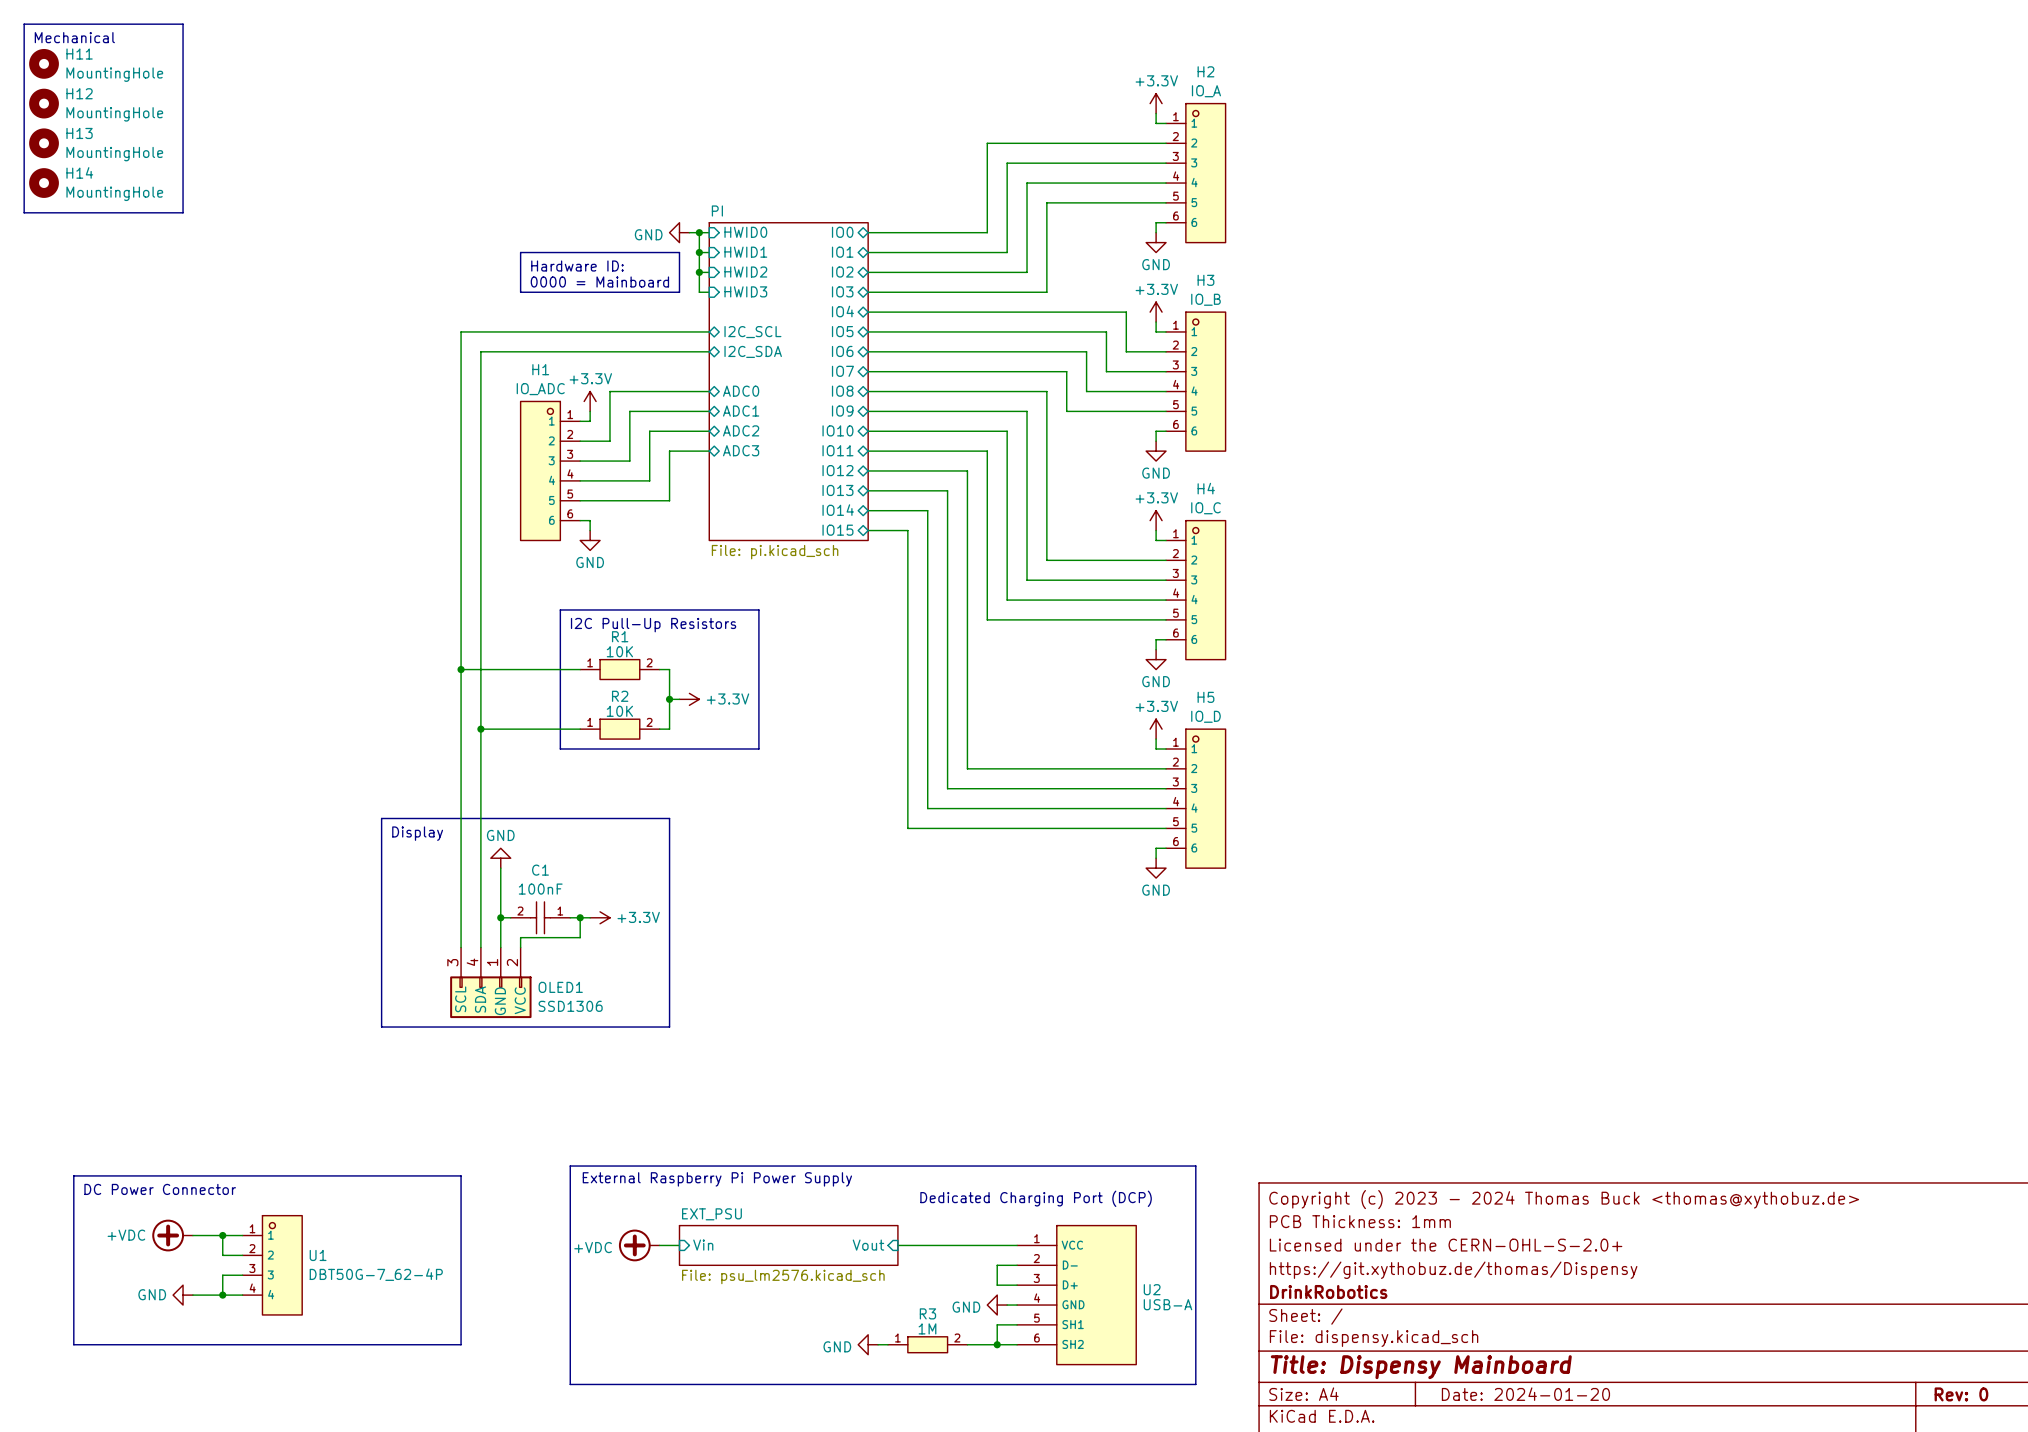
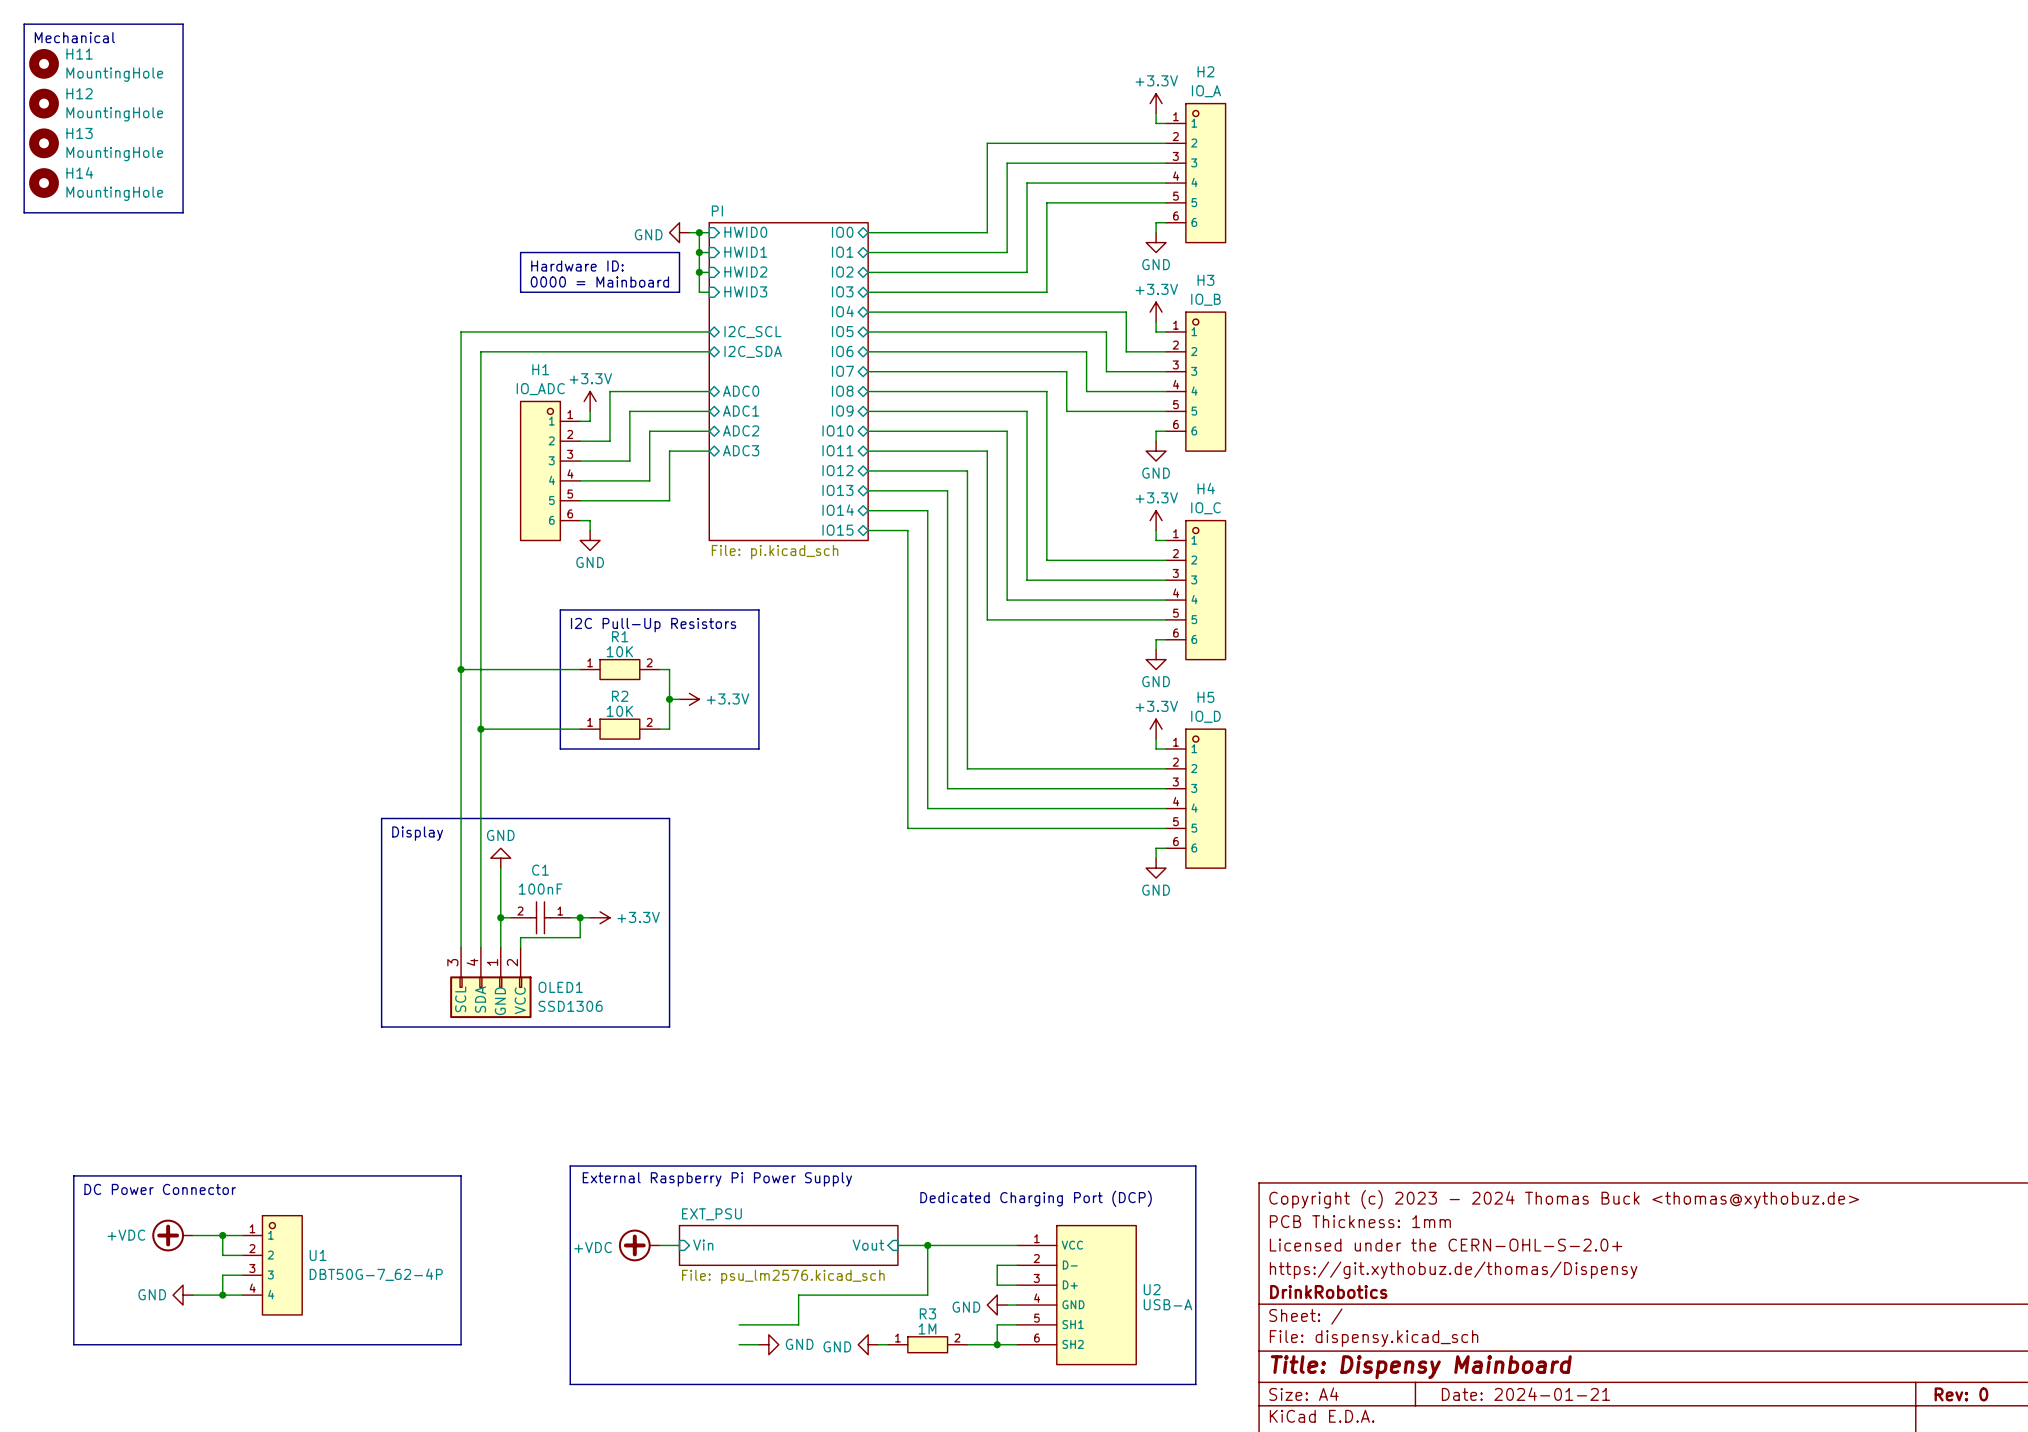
wire: none -> (927, 1245) (927, 1295) (798, 1295) (798, 1324) (739, 1324)
junction: none -> (927, 1245)
wire: none -> (739, 1344) (758, 1344)
power symbol: none -> GND (768, 1344)
title block: Date: 2024-01-20 (1525, 1394) -> Date: 2024-01-21 (1525, 1394)

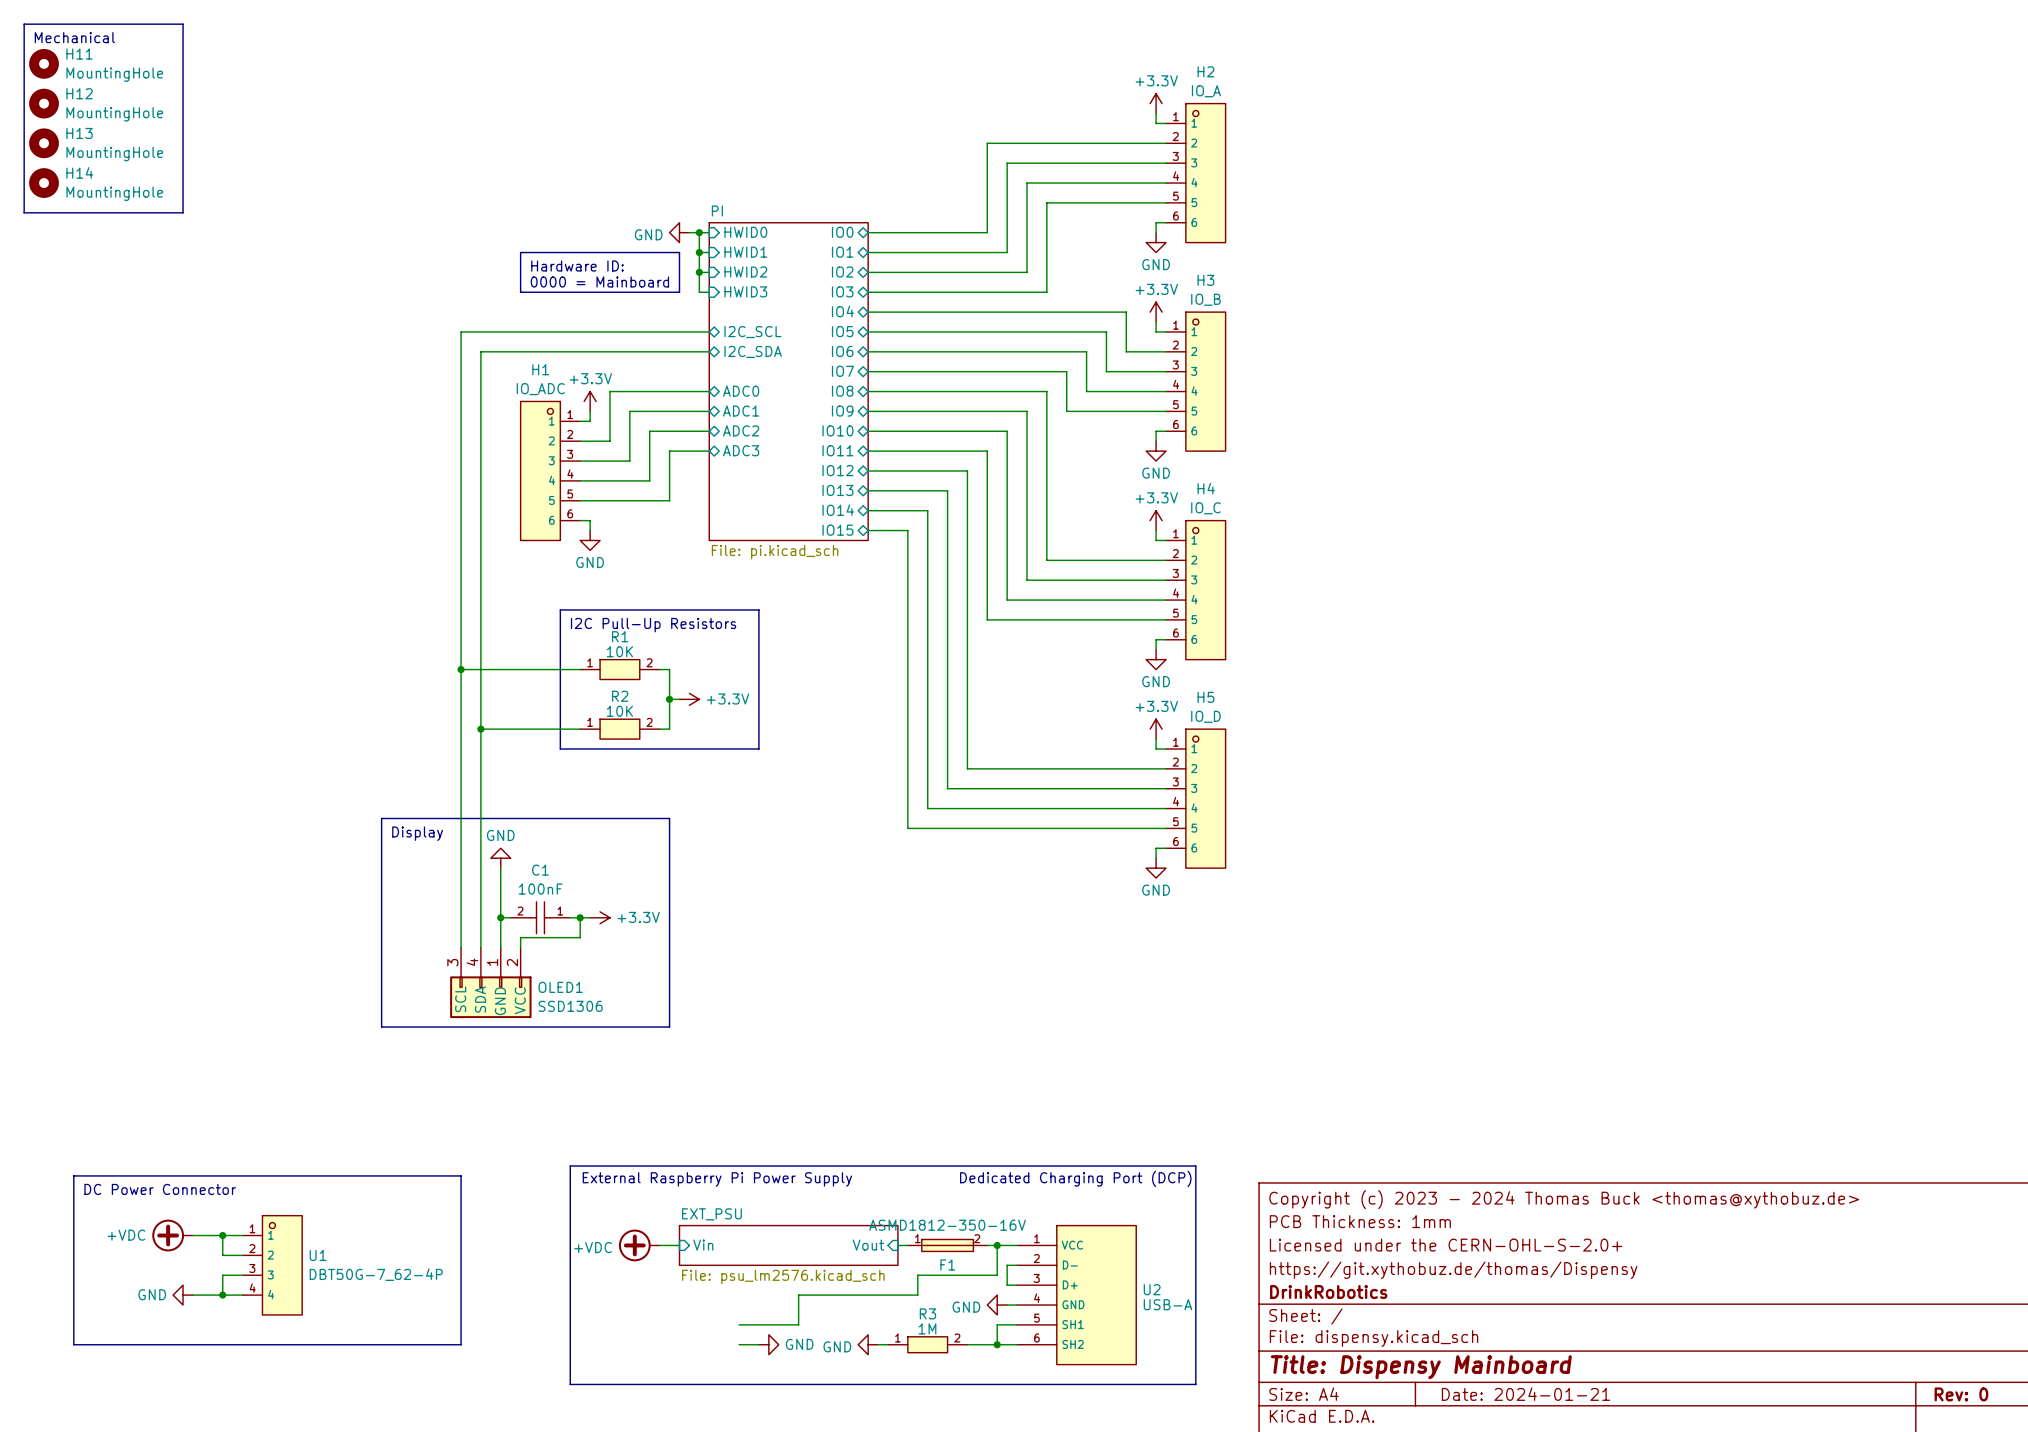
text position: Dedicated Charging Port (DCP) (1036, 1198) -> Dedicated Charging Port (DCP) (1075, 1178)
wire: (927, 1245) (927, 1295) (917, 1295) -> (997, 1275) (917, 1275) (917, 1295)
junction: (927, 1245) -> none
F1: none -> ASMD1812-350-16V (947, 1245)
junction: none -> (997, 1245)
wire: (997, 1265) (1007, 1265) -> (997, 1265) (997, 1245)
wire: (997, 1275) (997, 1285) (1007, 1285) -> (1007, 1265) (1007, 1285)

